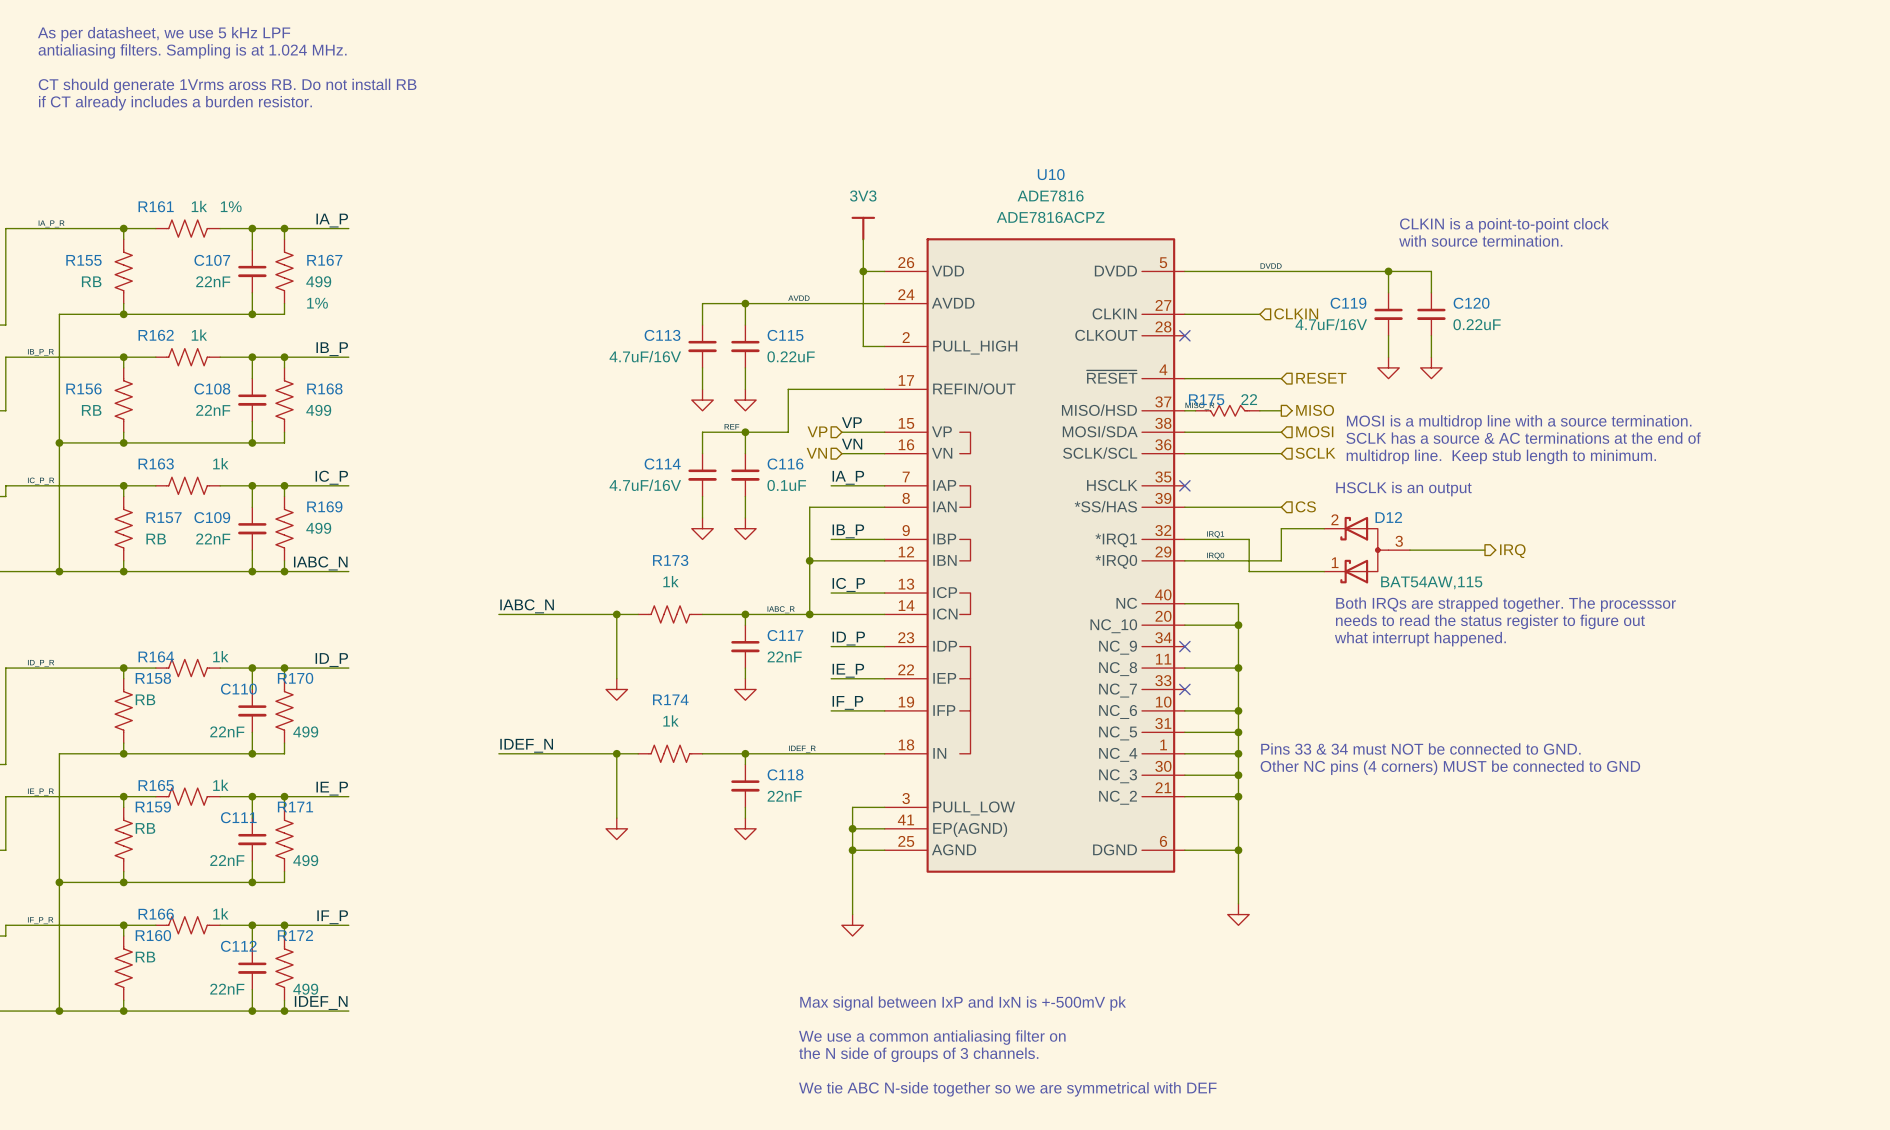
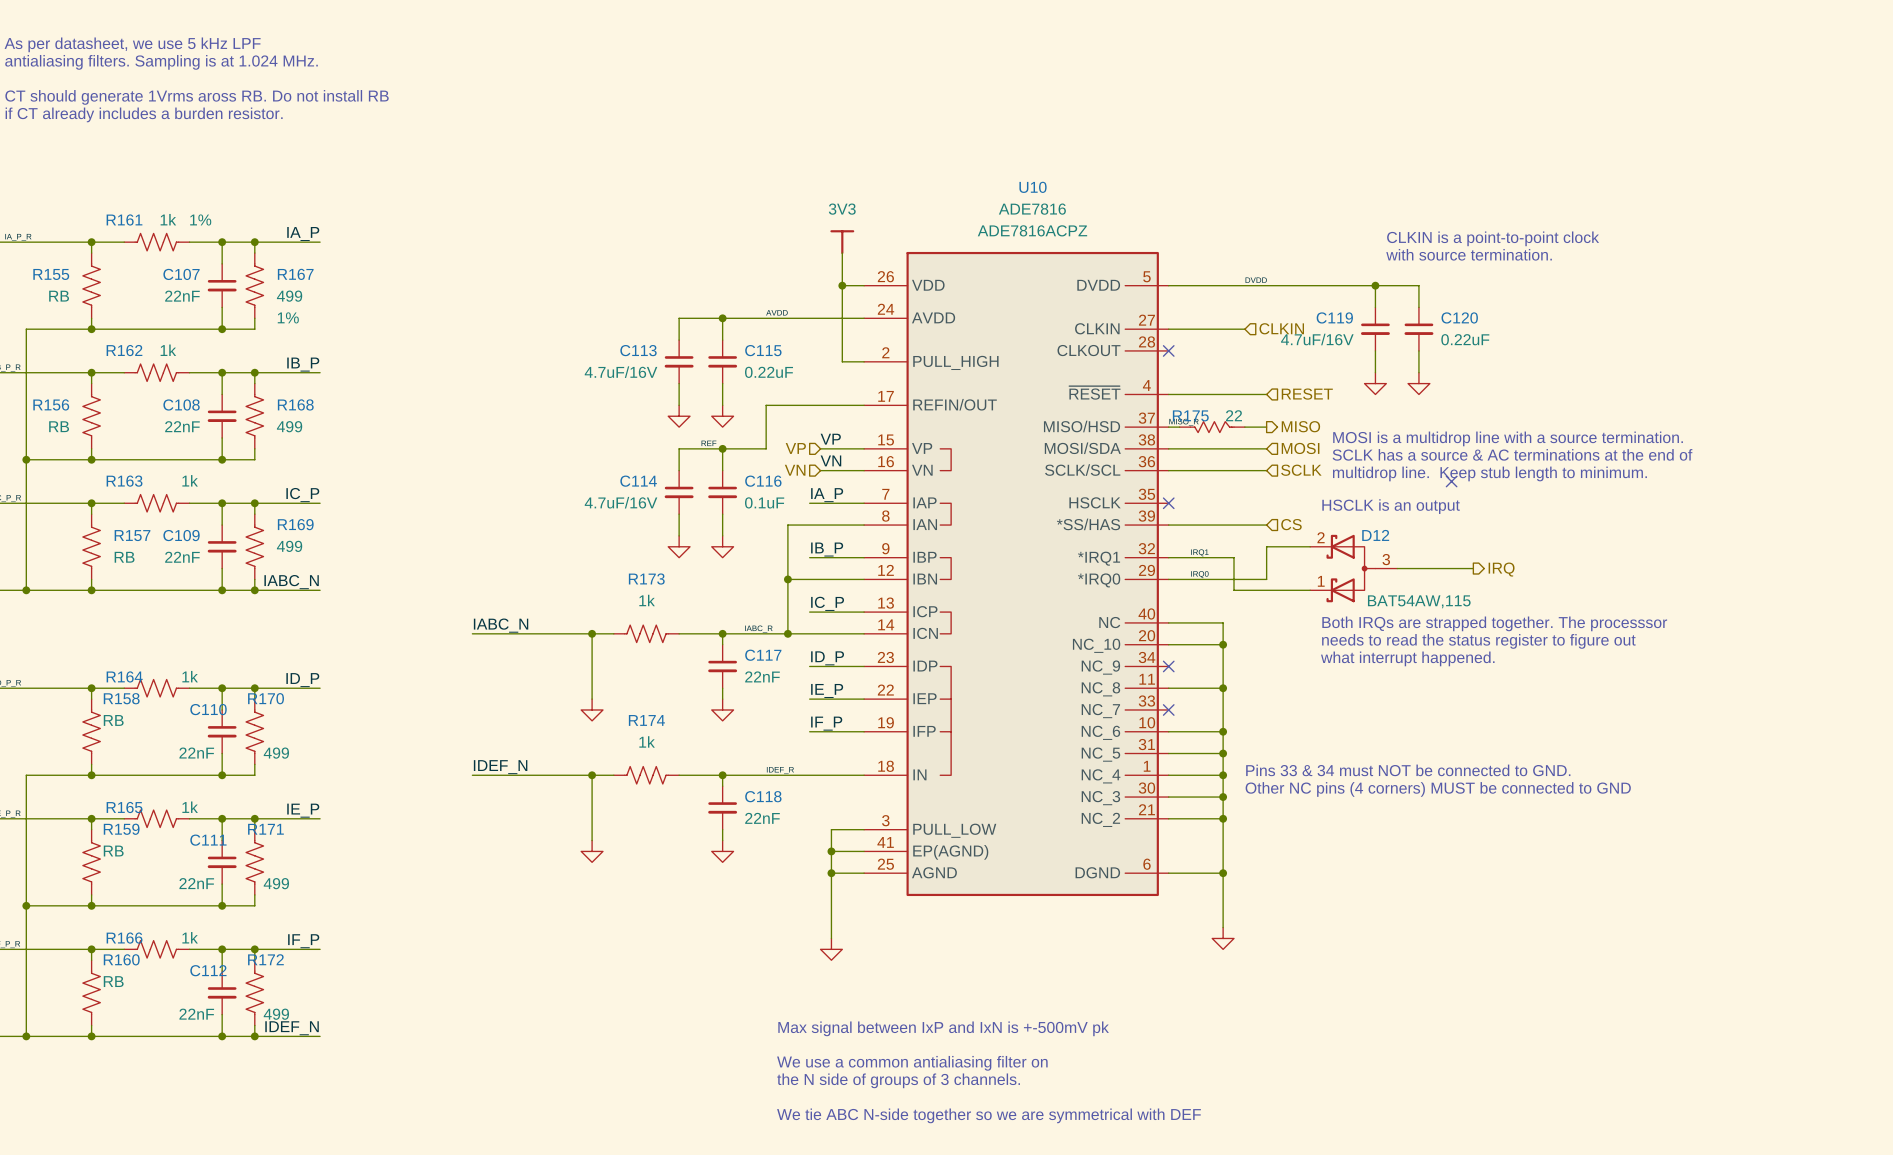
no-connect mark: none -> (1451, 481)

